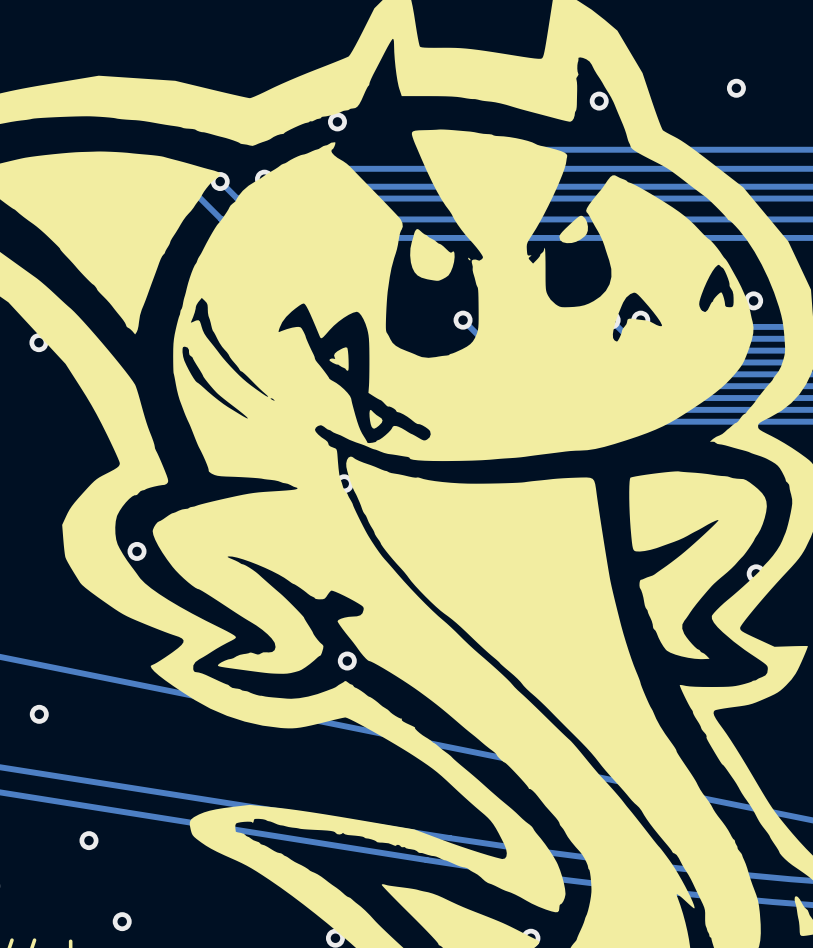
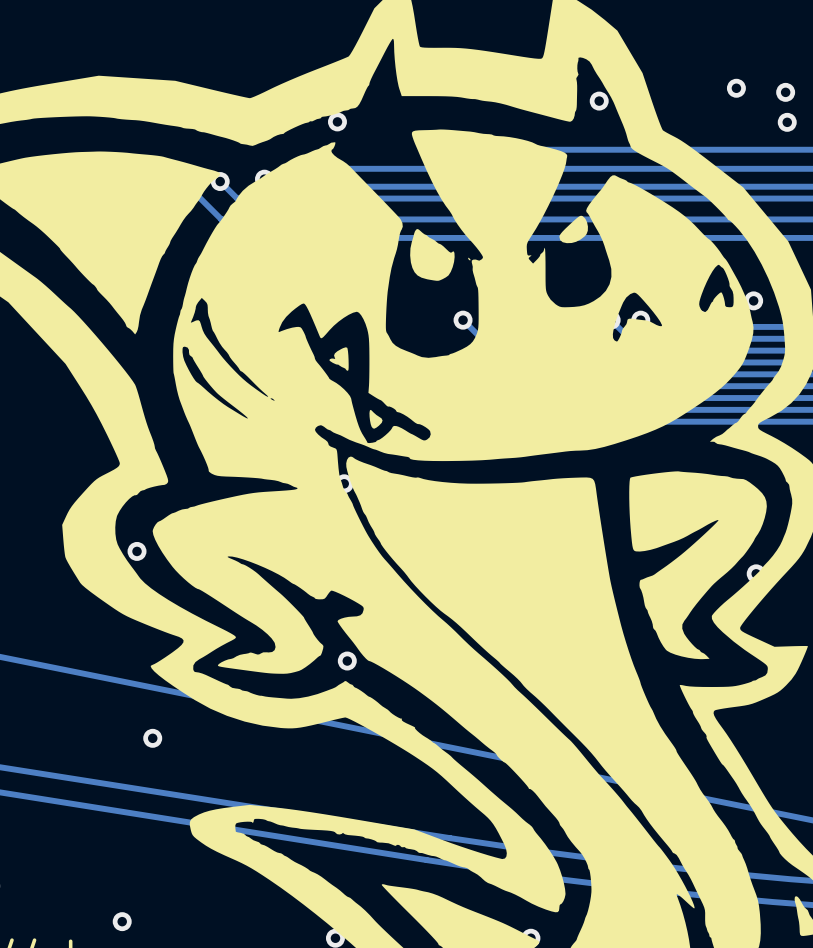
via: none -> (785, 92)
via: none -> (787, 122)
via: (38, 342) -> none
via: (39, 714) -> none
via: none -> (152, 738)
via: (88, 840) -> none

